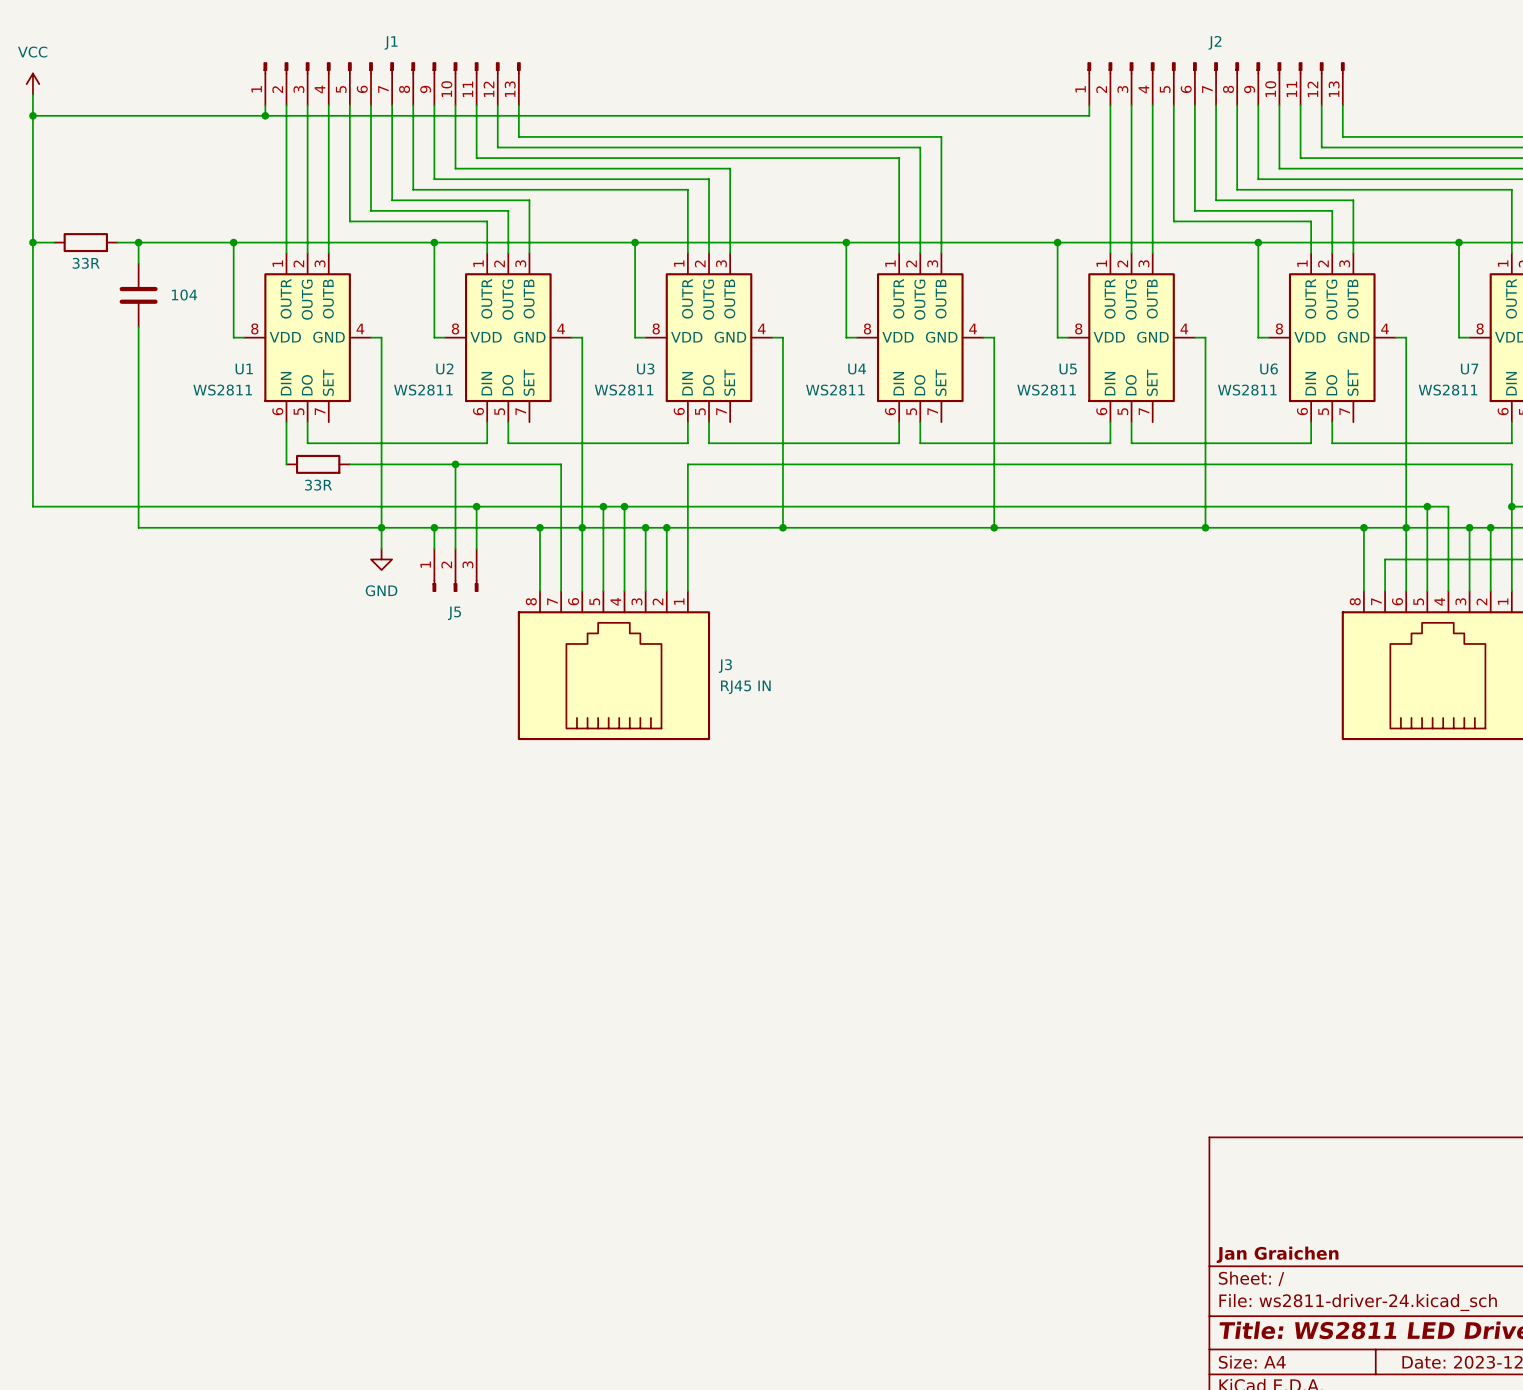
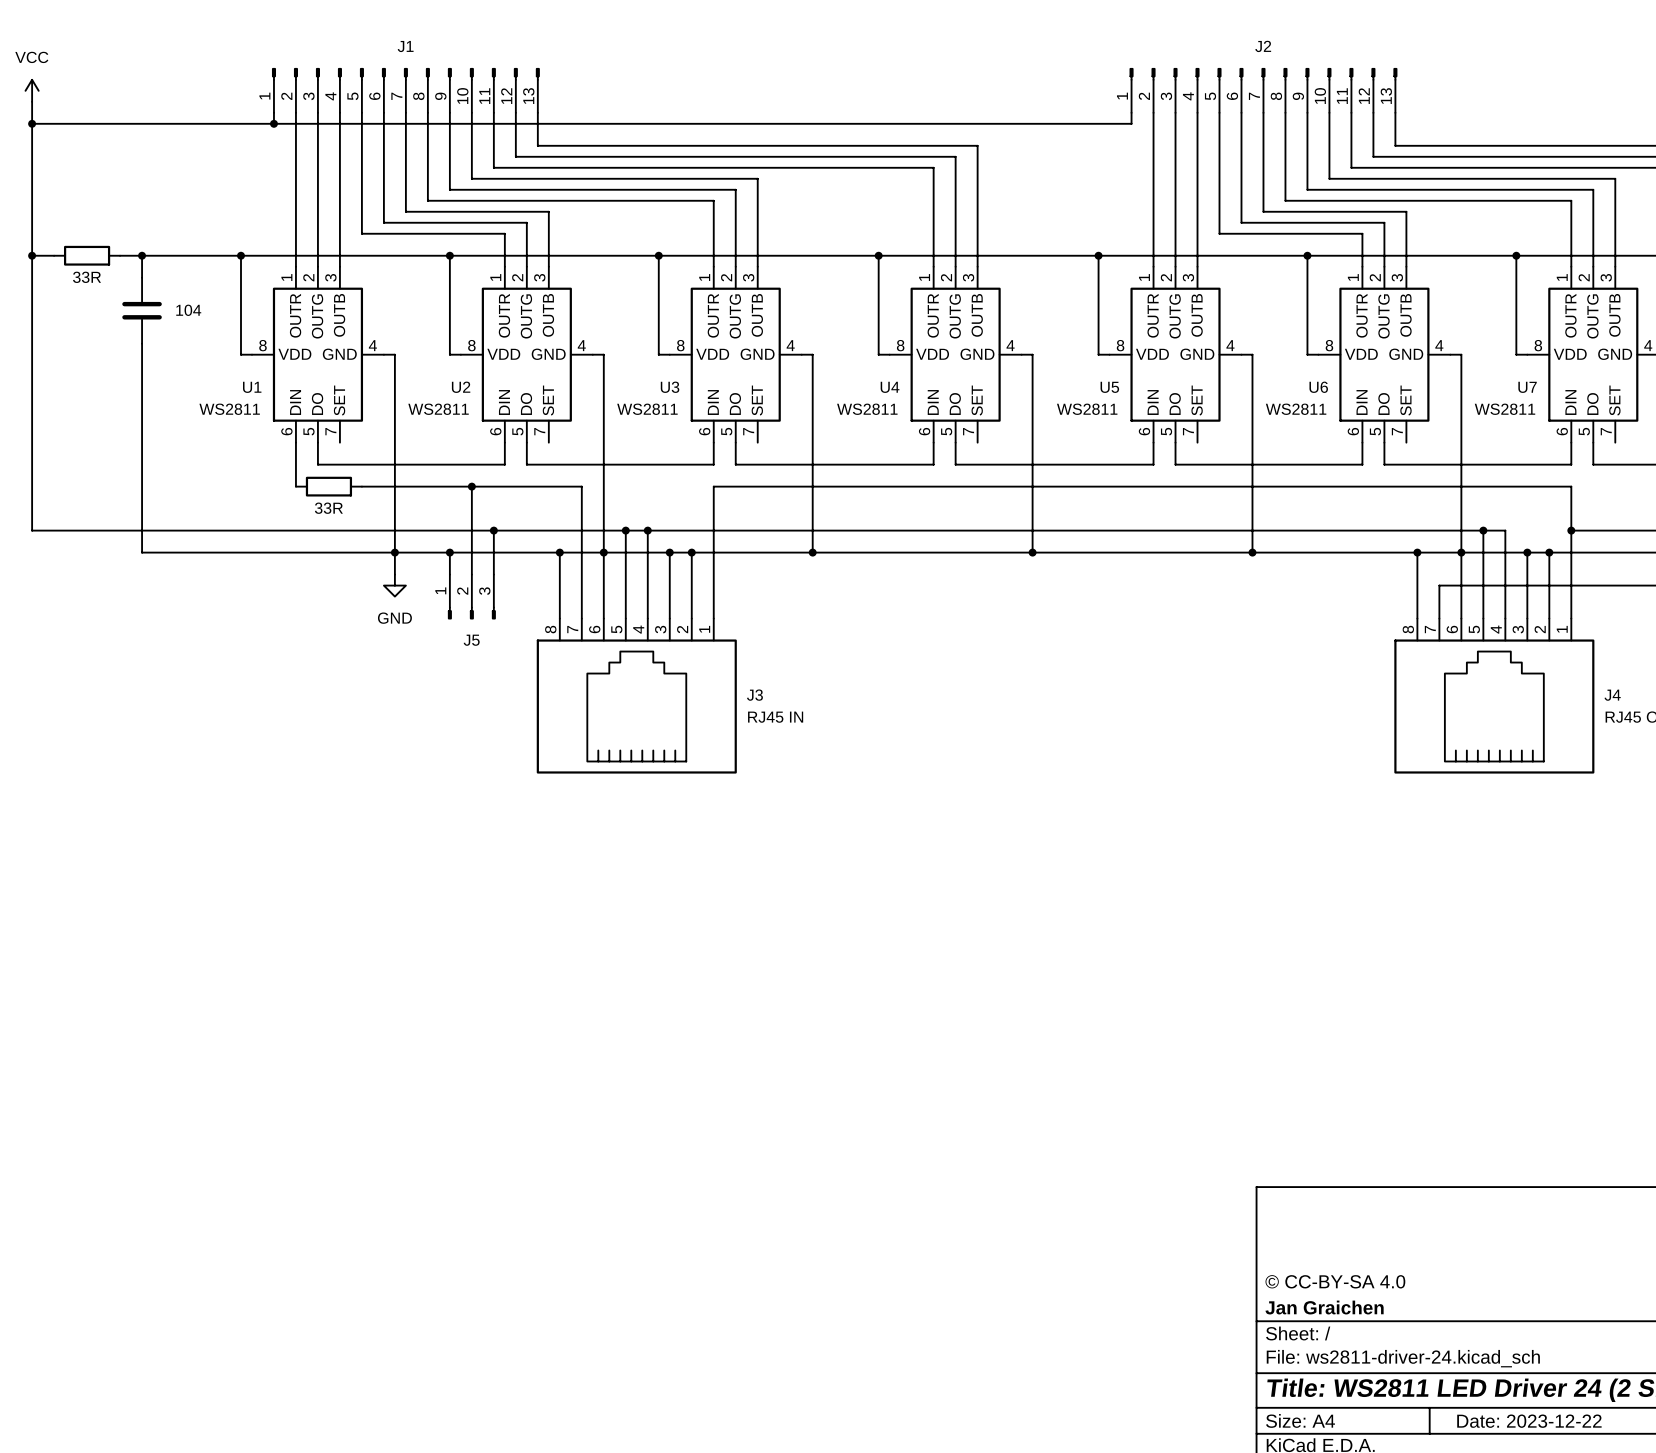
title block: none -> © CC-BY-SA 4.0 (1335, 1281)

